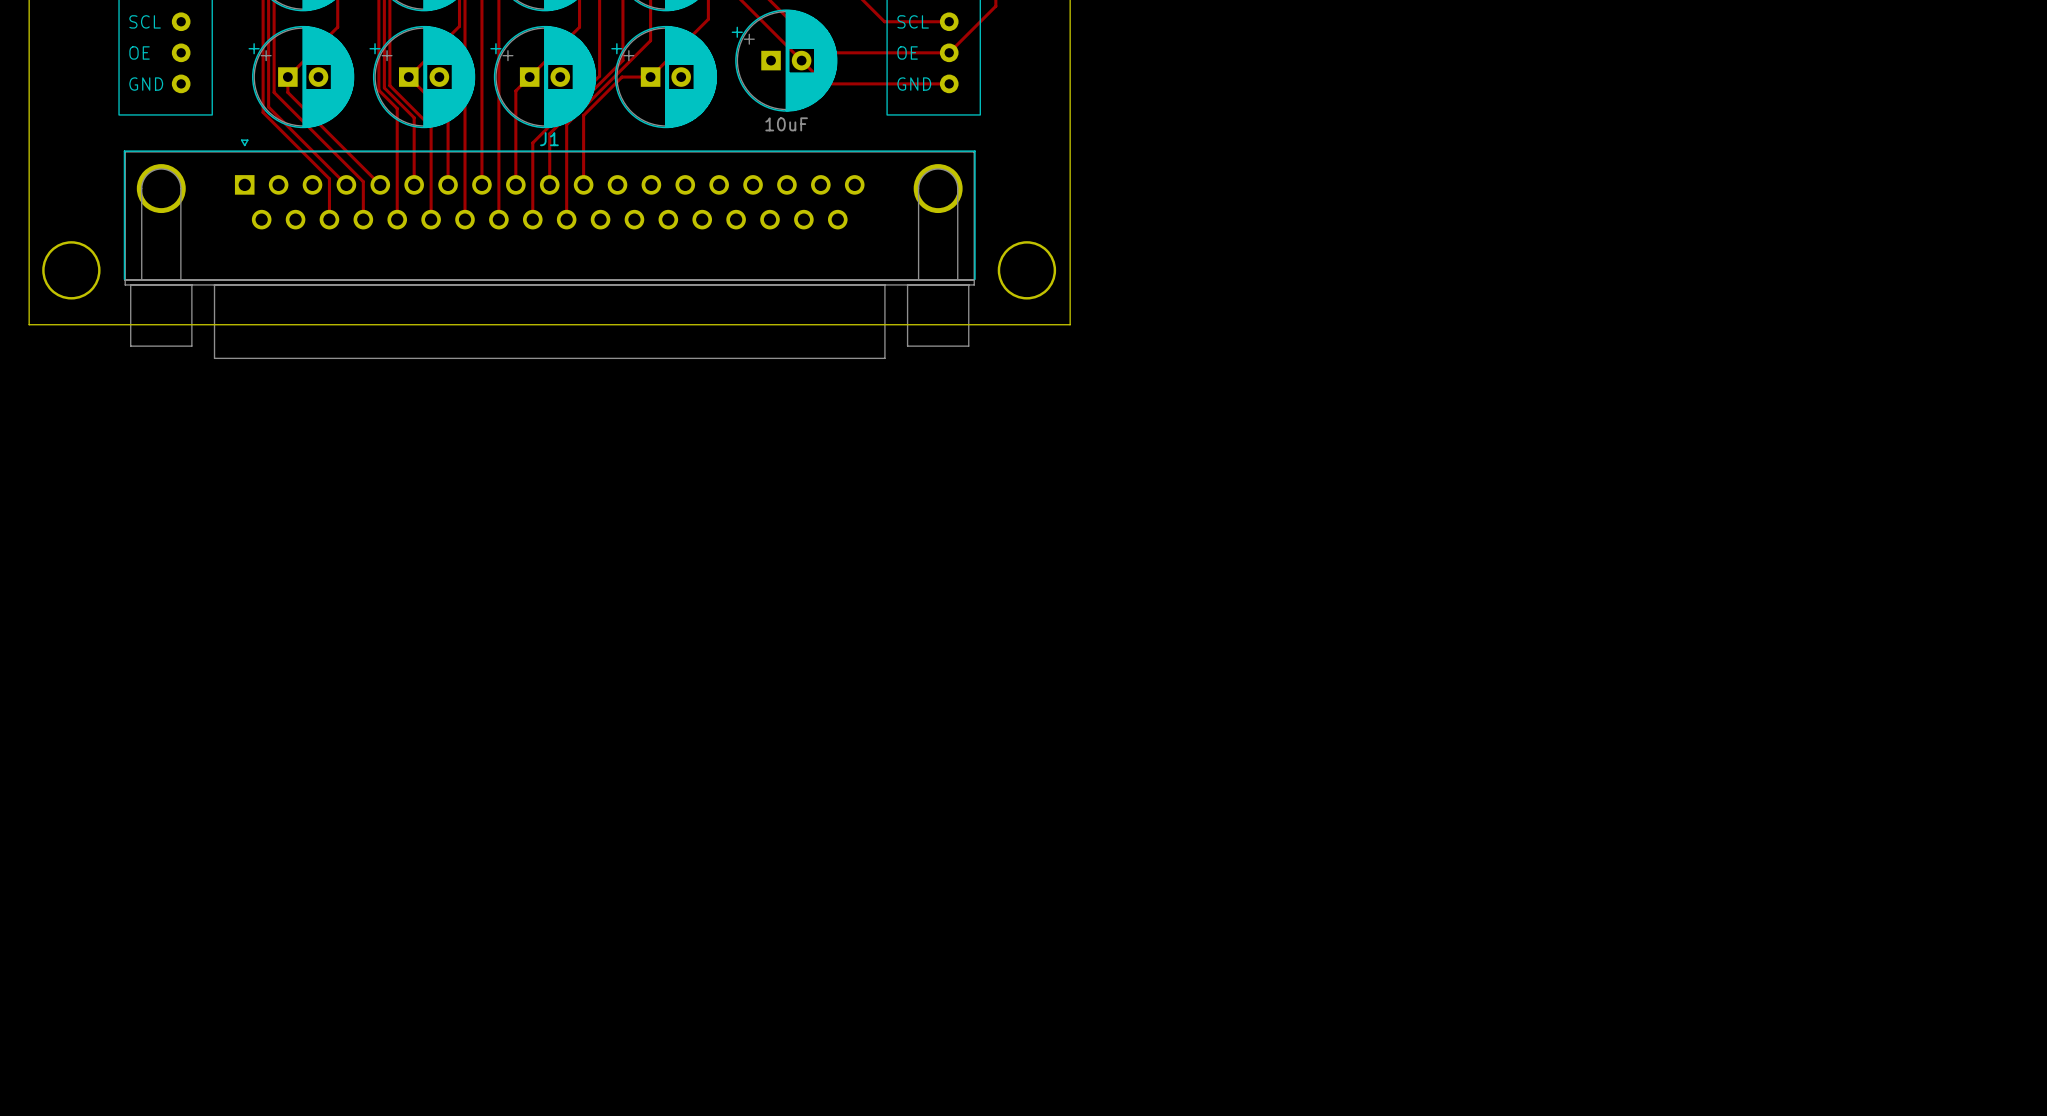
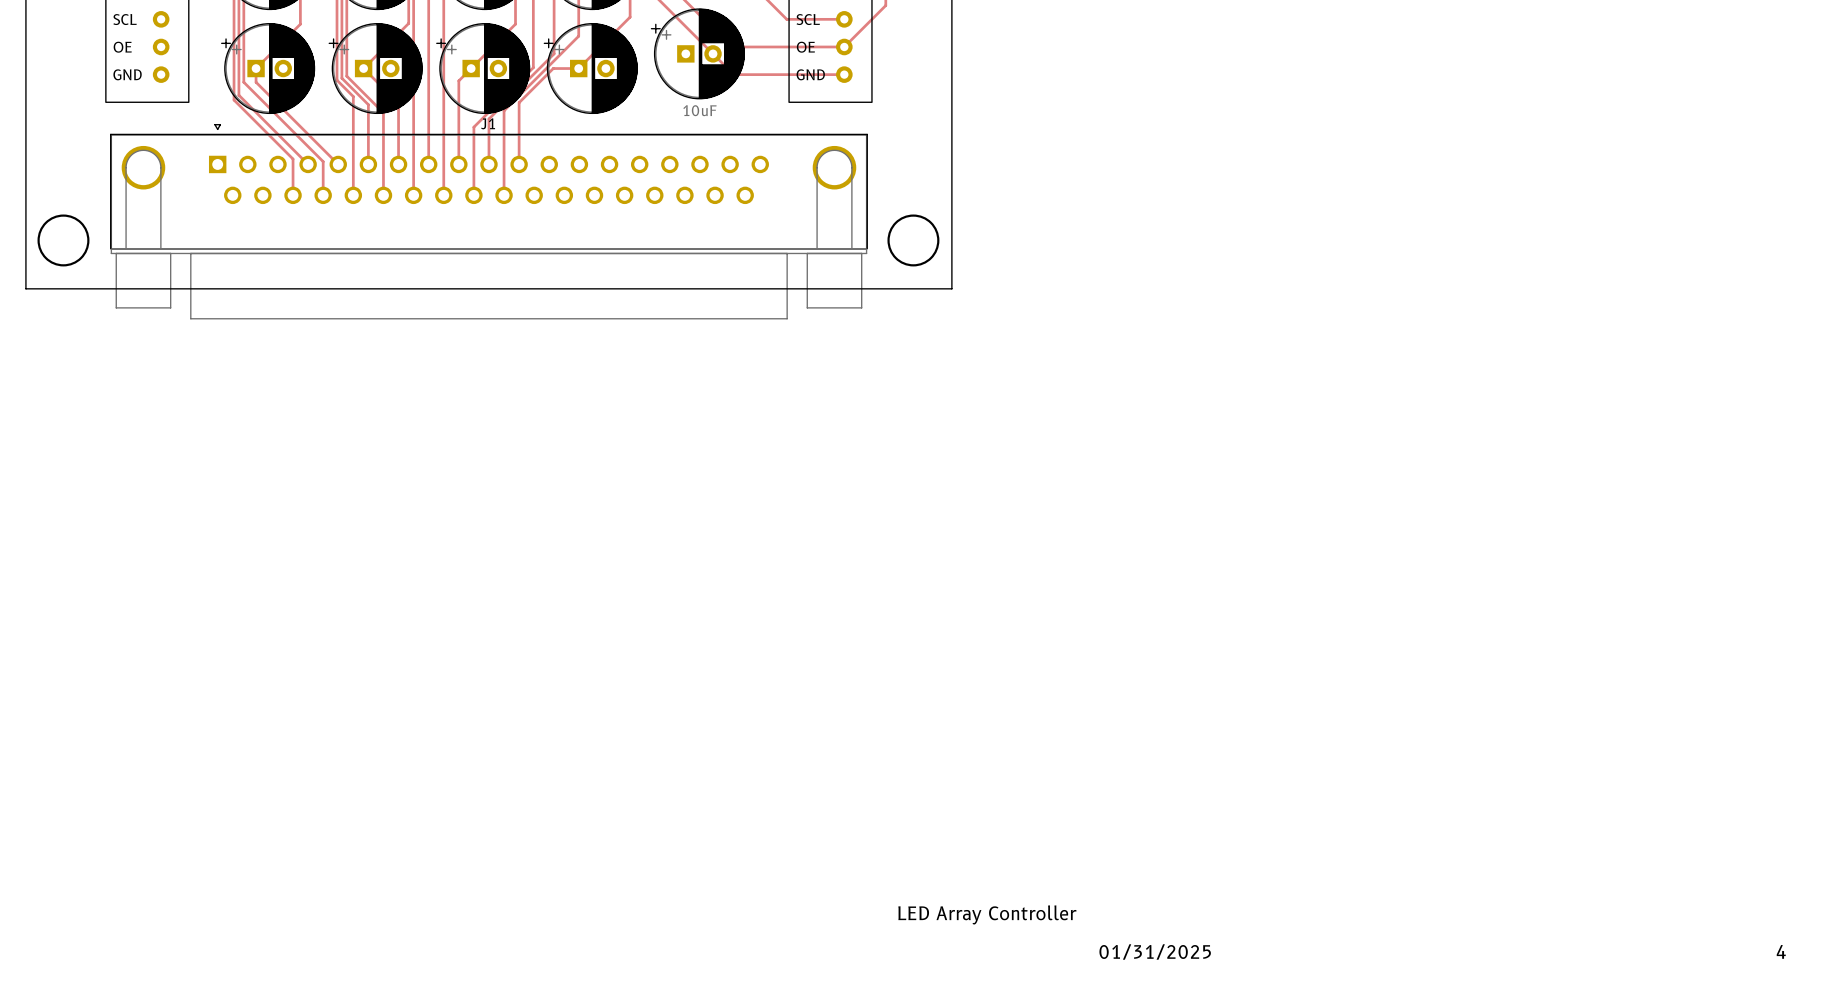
text: none -> LED Array Controller (987, 914)
text: none -> 4 (1781, 951)
text: none -> 01/31/2025 (1155, 951)

